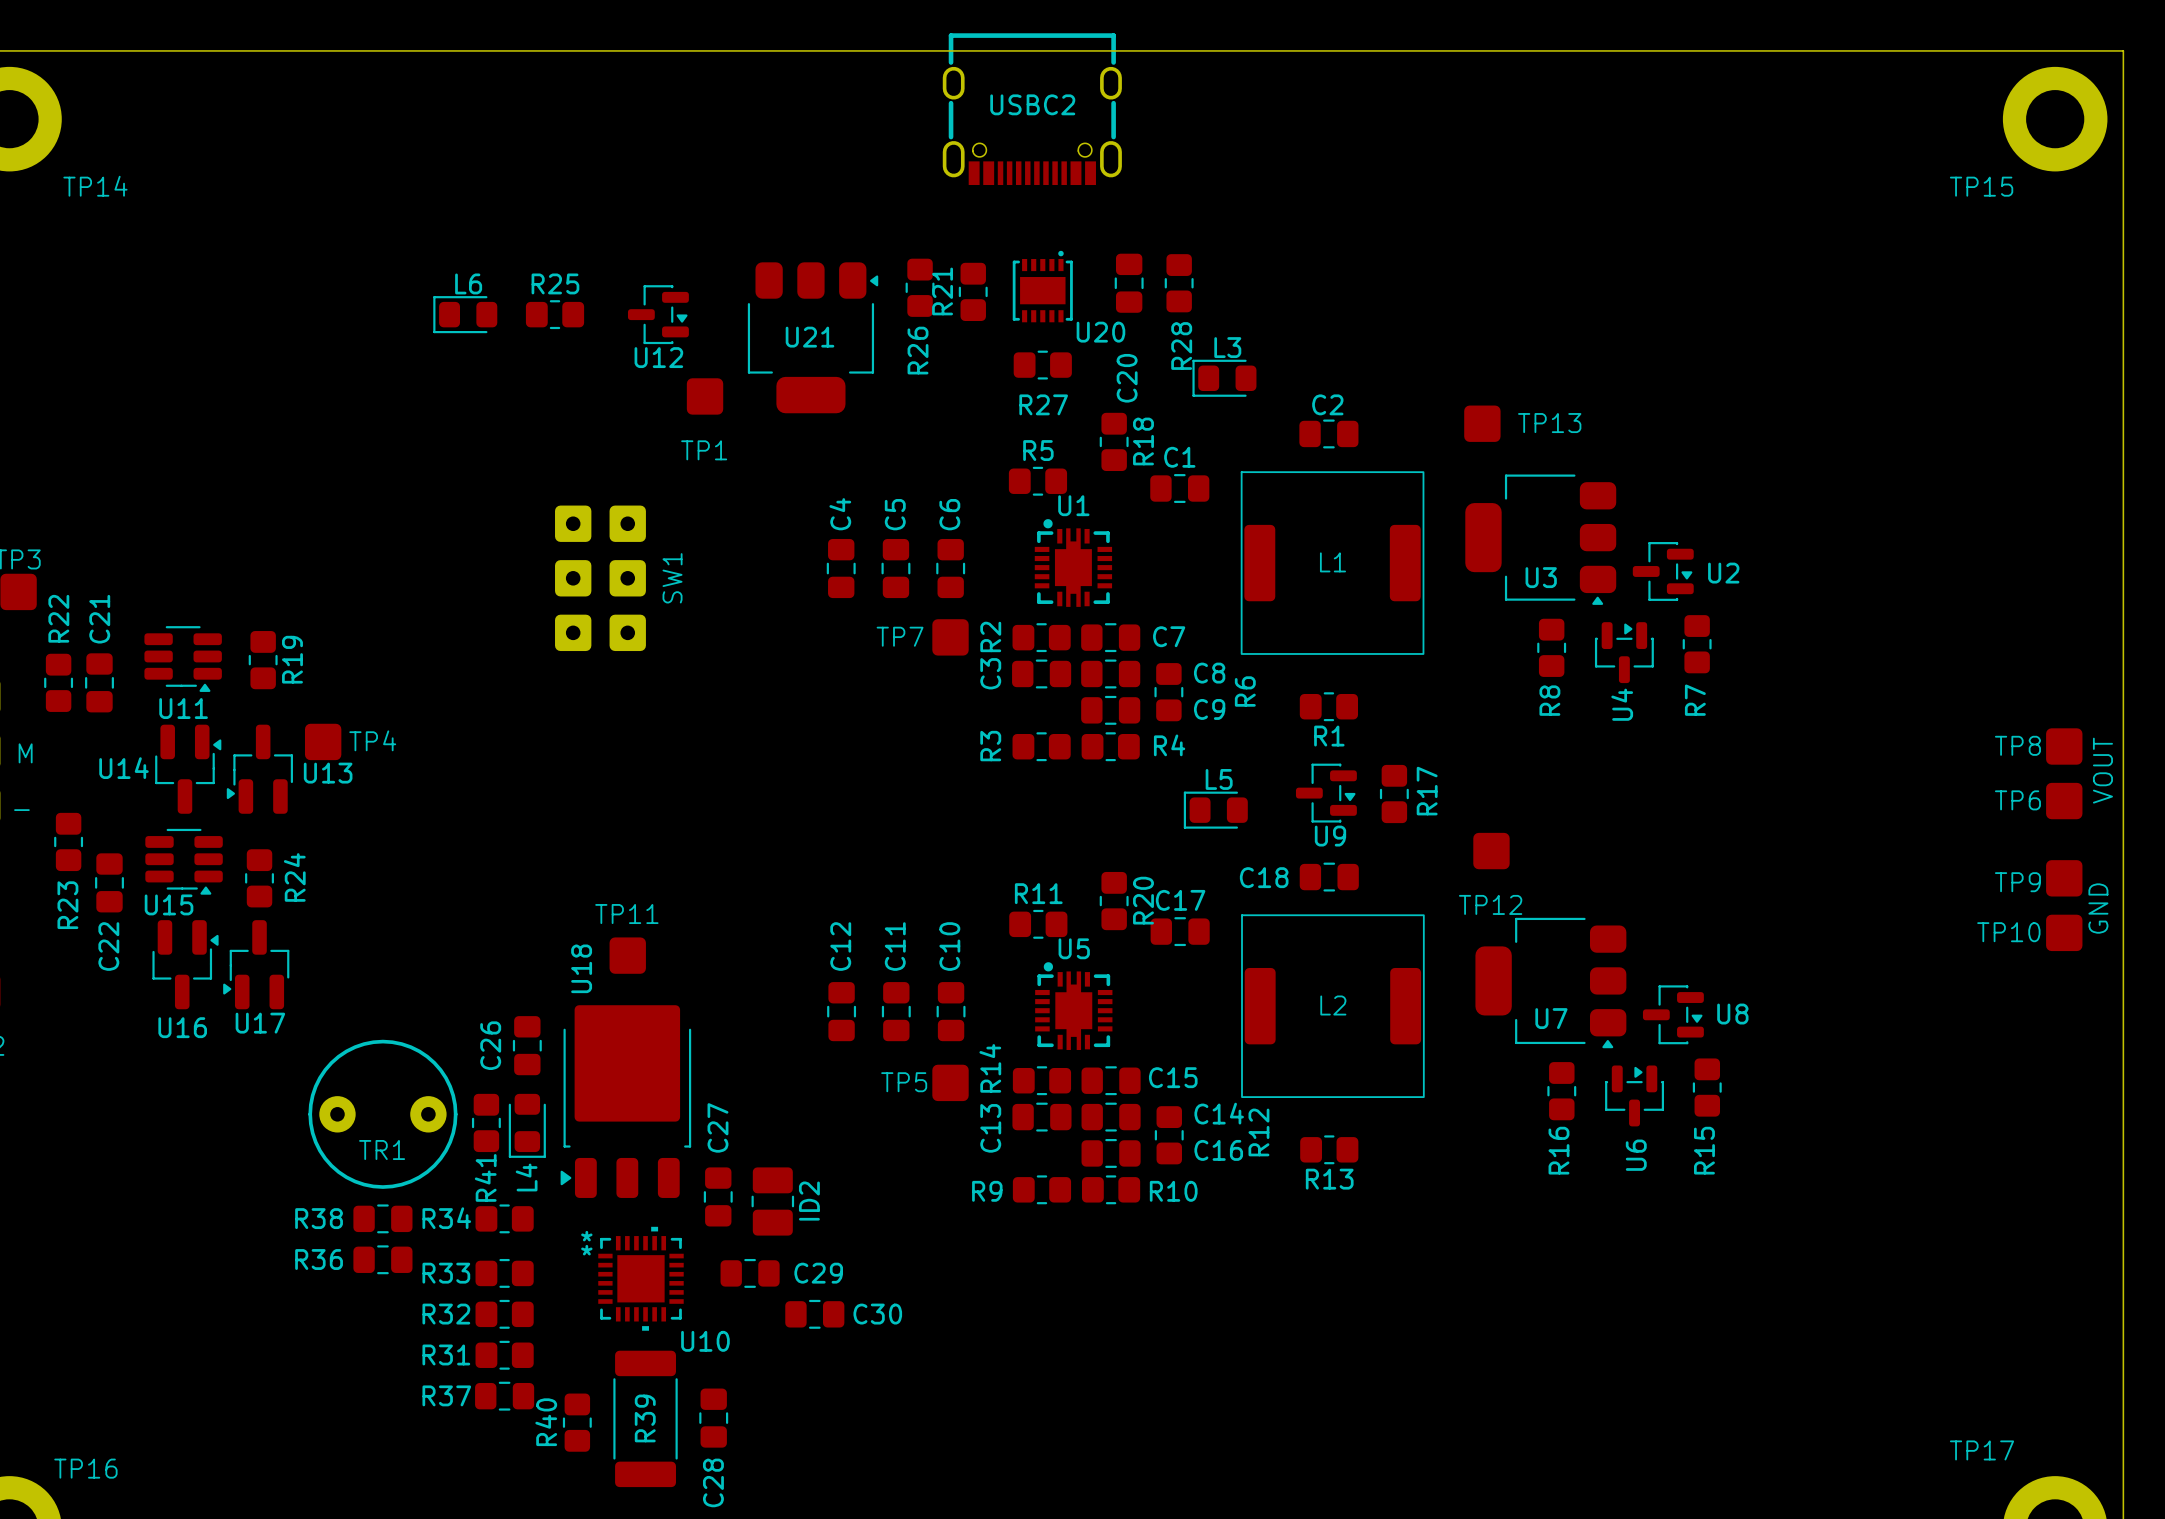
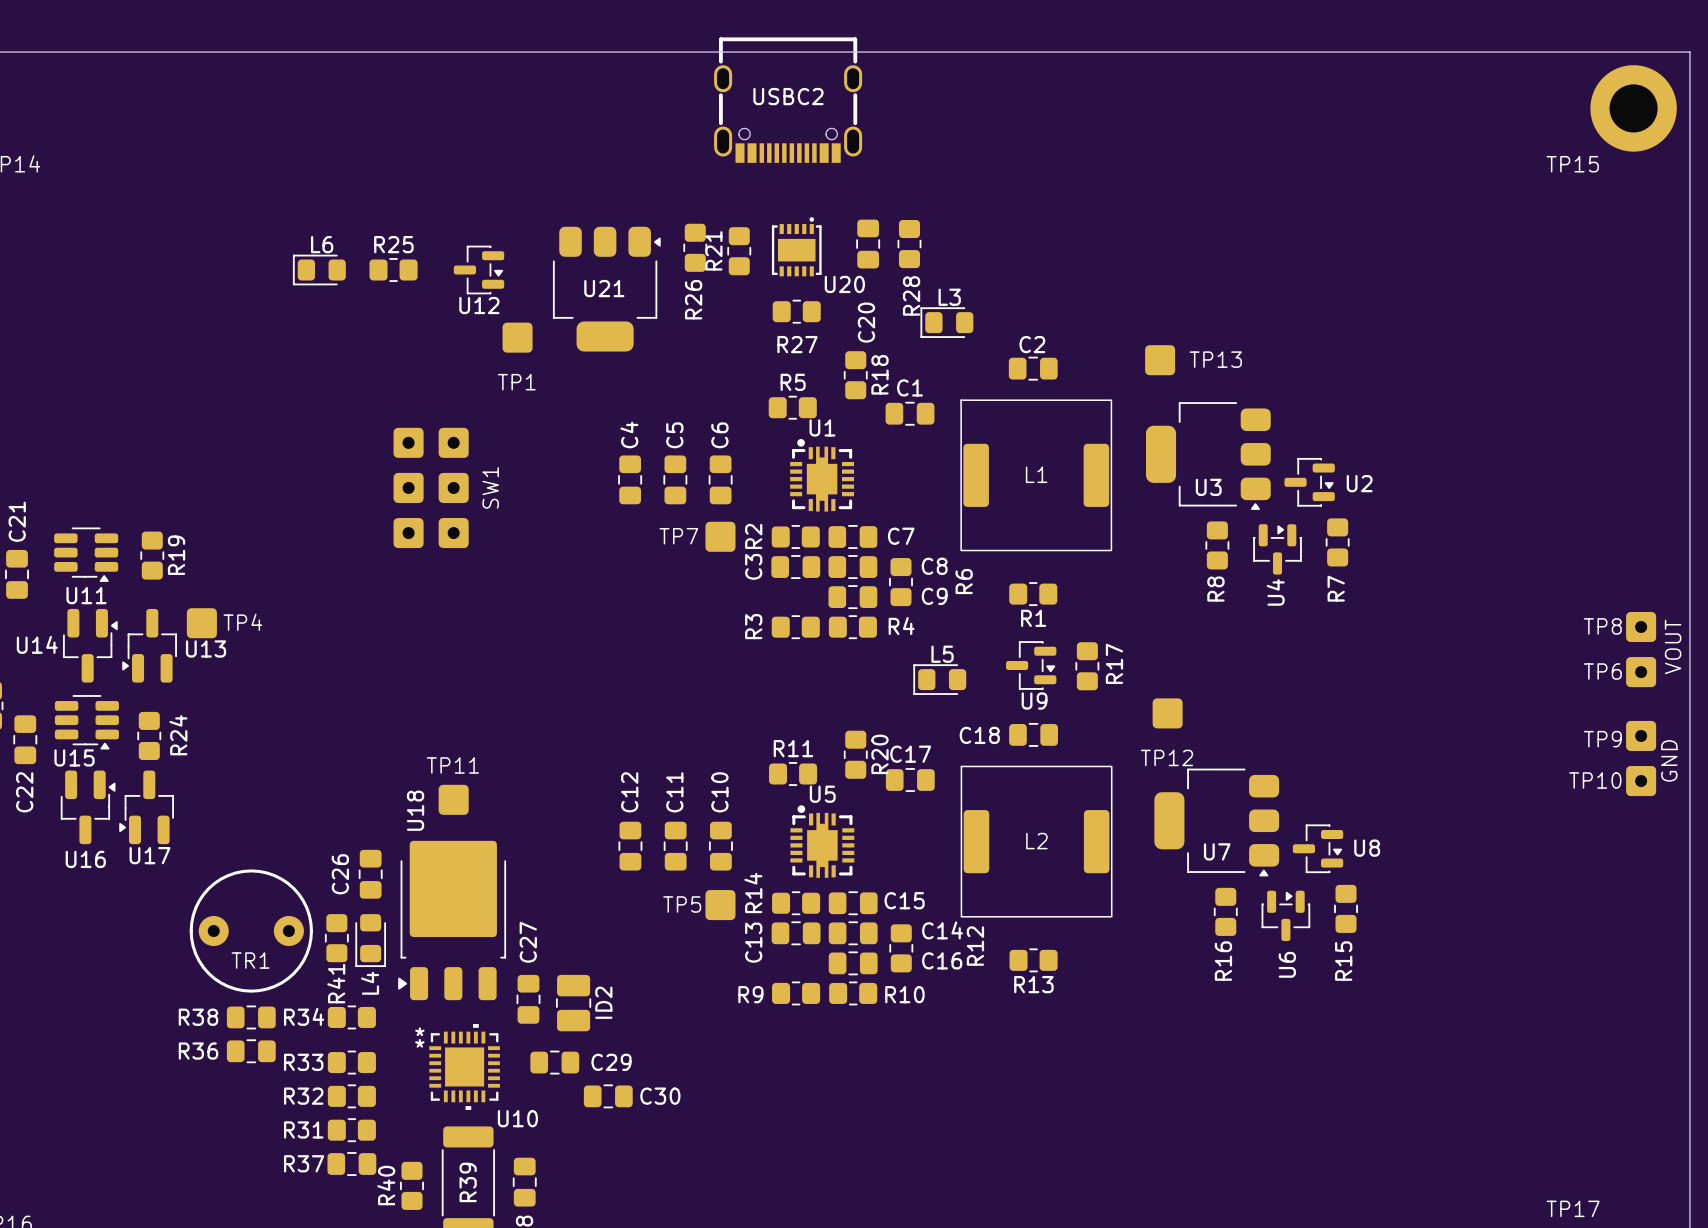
TP8 footprint: [2046, 728, 2083, 765] -> [1626, 611, 1657, 643]
TP6 footprint: [2046, 782, 2083, 820] -> [1626, 657, 1657, 688]
TP9 footprint: [2046, 860, 2083, 897] -> [1626, 720, 1657, 751]
TP10 footprint: [2046, 914, 2083, 952] -> [1626, 766, 1657, 797]

